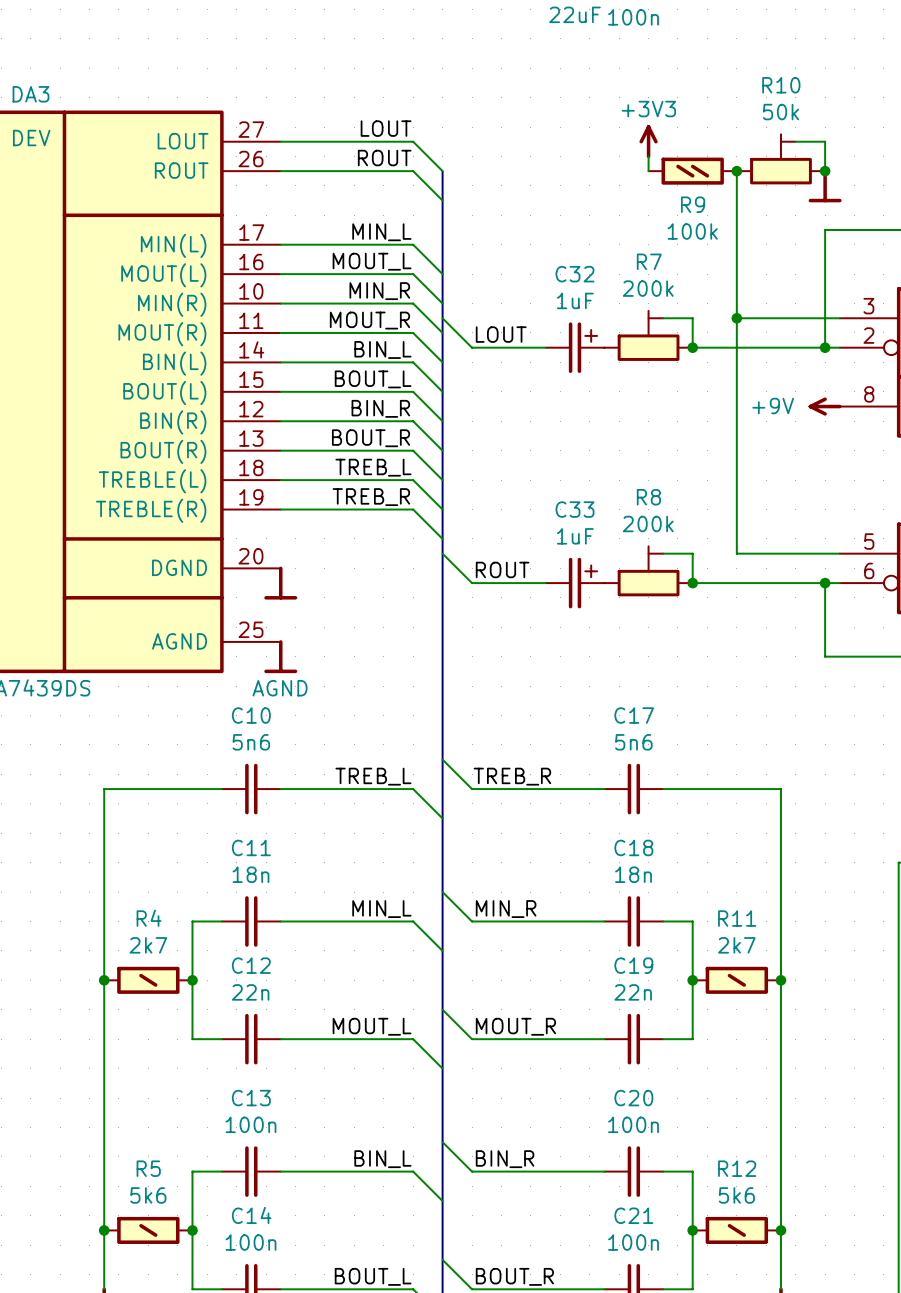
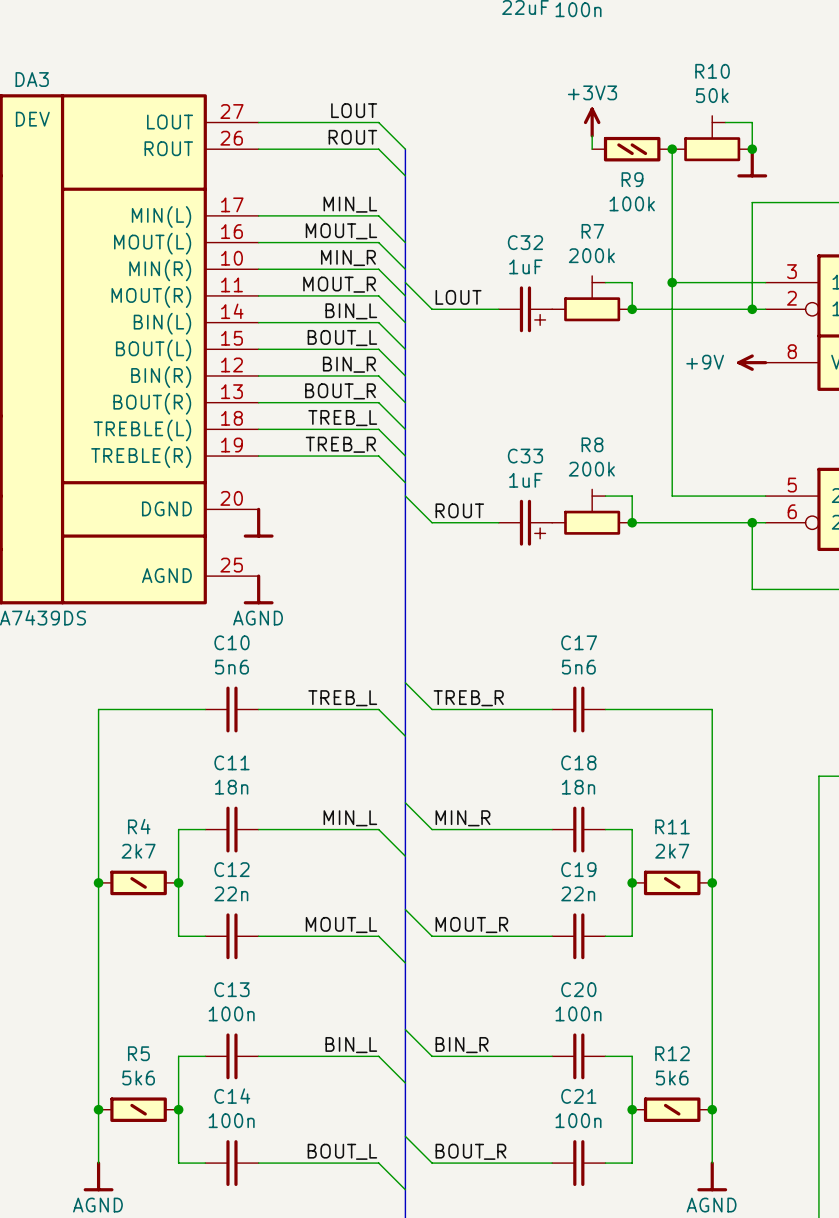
C32 flip: as is (583, 347) -> up-down (532, 309)
C33 flip: as is (583, 583) -> up-down (532, 522)

